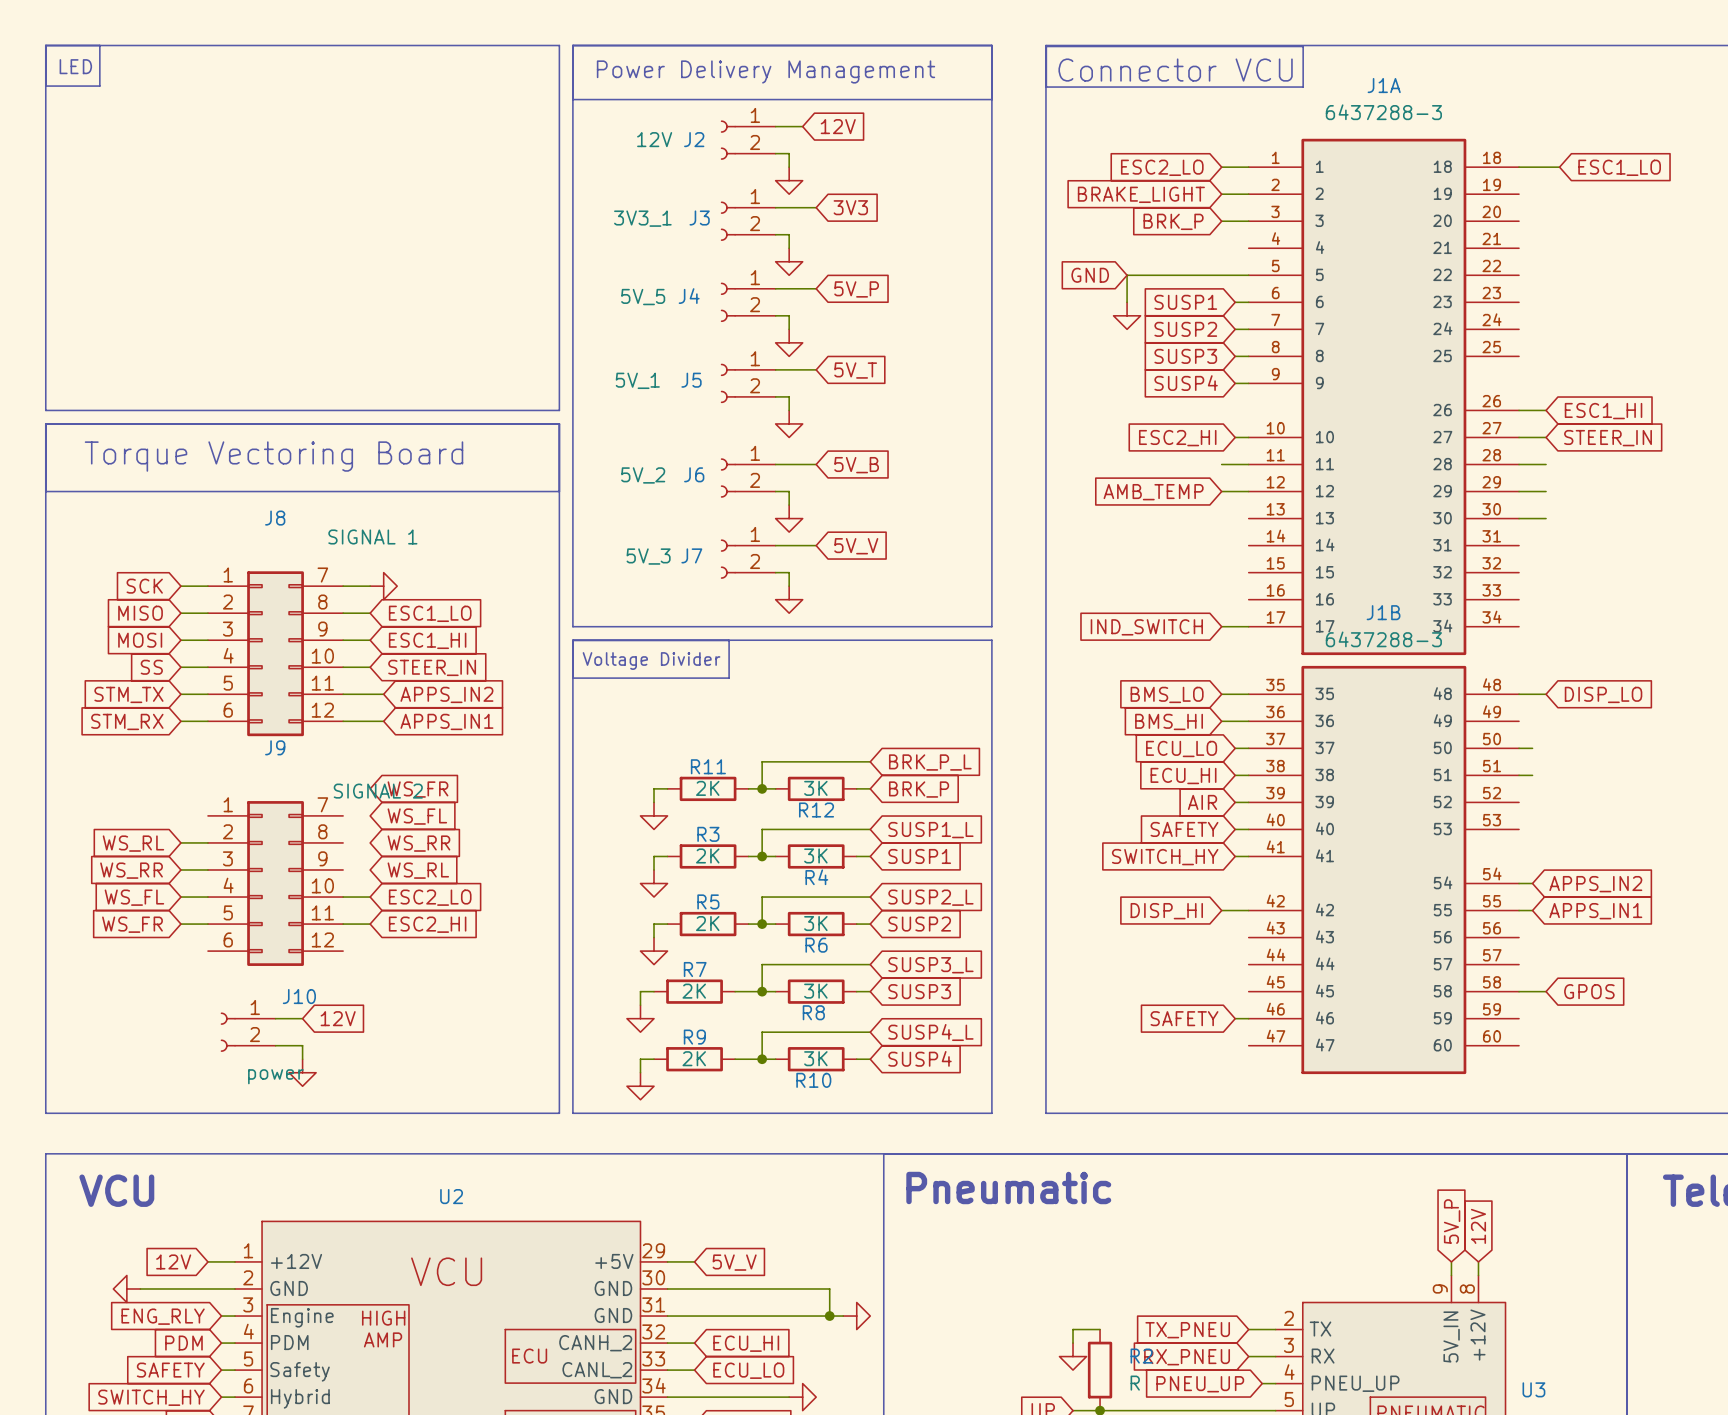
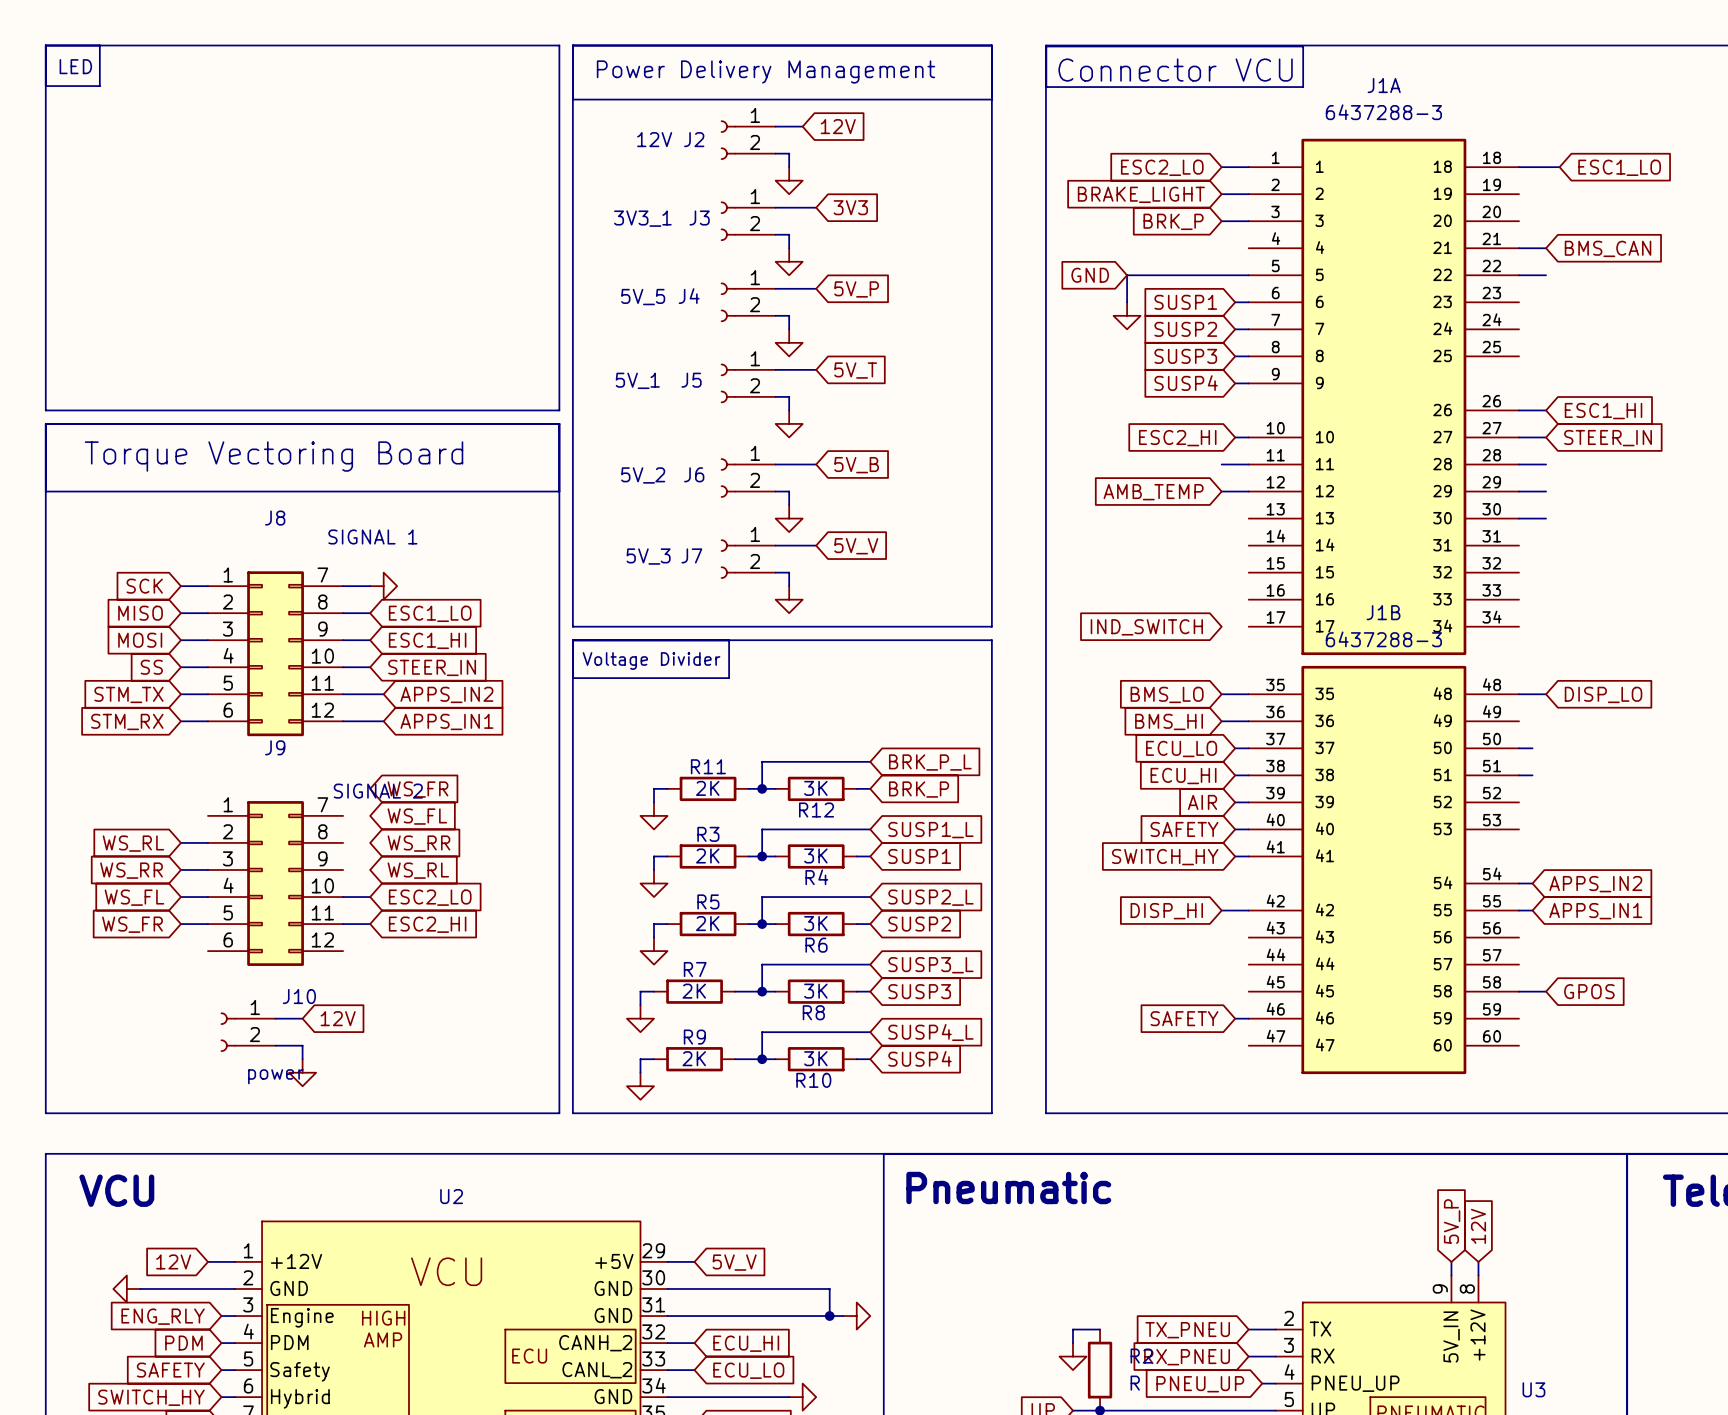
wire: none -> (1519, 248) (1546, 248)
global label: none -> BMS_CAN (1608, 248)
wire: none -> (1519, 275) (1546, 275)
wire: (1221, 626) (1248, 626) -> none

